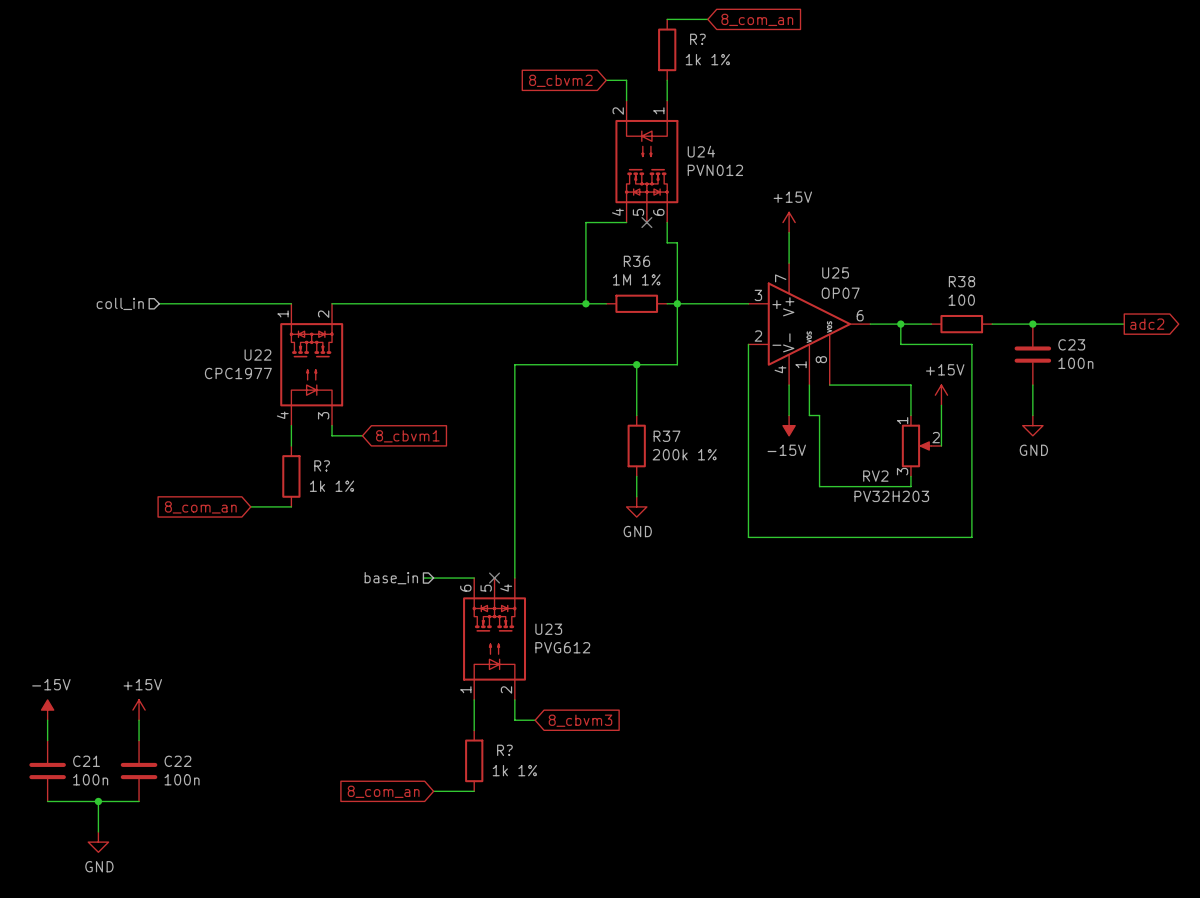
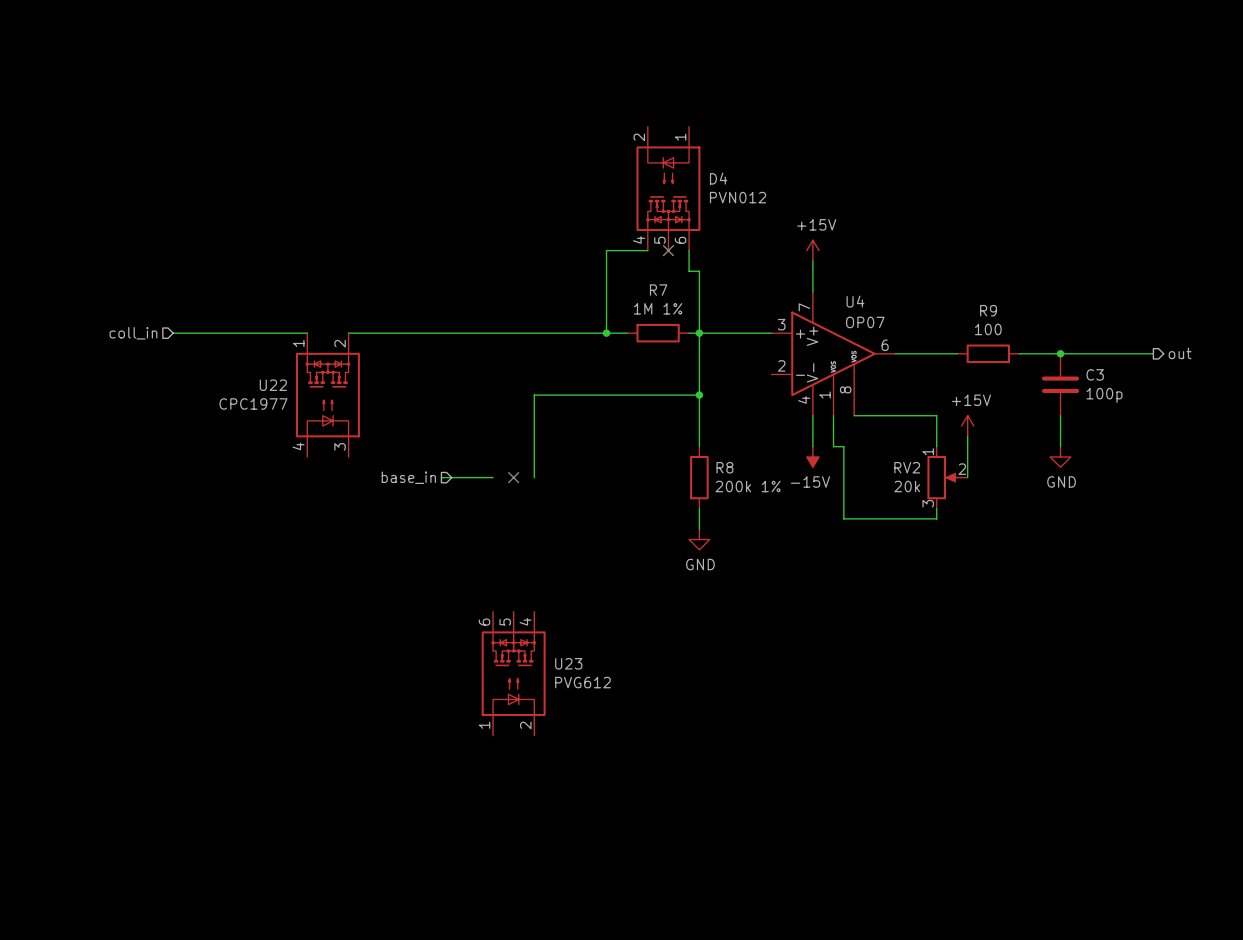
wire: (667, 19) (707, 19) -> none
global label: 8_com_an (757, 19) -> none
R?: 1k 1% (667, 49) -> none
global label: 8_cbvm2 (560, 80) -> none
wire: (606, 80) (626, 80) (626, 100) -> none
wire: (667, 80) (667, 100) -> none
U24 name: U24 (701, 151) -> D4 (718, 178)
R36 name: R36 (636, 261) -> R7 (658, 290)
U25 name: U25 (835, 272) -> U4 (855, 301)
R38 name: R38 (961, 281) -> R9 (988, 310)
hierarchical label: none -> out (1180, 353)
wire: (900, 324) (900, 344) (971, 344) (971, 537) (748, 537) (748, 344) -> none
junction: (900, 324) -> none
global label: adc2 (1147, 324) -> none
C23 name: C23 (1071, 344) -> C3 (1095, 374)
C23 value: 100n (1075, 363) -> 100p (1104, 395)
wire: (636, 364) (636, 415) -> (699, 395) (699, 446)
junction position: (636, 364) -> (699, 395)
wire: (291, 425) (291, 445) -> none
wire: (332, 425) (332, 435) (362, 435) -> none
global label: 8_cbvm1 (407, 436) -> none
no-connect mark: none -> (513, 477)
wire: (514, 445) (514, 578) -> none
R37: 200k 1% (636, 445) -> none
R8: none -> 200k 1% (699, 477)
R?: 1k 1% (291, 476) -> none
wire: (636, 476) (636, 496) -> (699, 508) (699, 529)
RV2 name position: RV2 (875, 476) -> RV2 (907, 467)
RV2 value: PV32H203 (891, 496) -> 20k (907, 486)
wire: (250, 506) (291, 506) -> none
power symbol position: GND (636, 506) -> GND (699, 539)
global label: 8_com_an (200, 507) -> none
hierarchical label position: base_in (391, 578) -> base_in (408, 477)
wire: (423, 578) (474, 578) -> (441, 477) (493, 477)
no-connect mark: (494, 578) -> none
wire: (474, 699) (474, 730) -> none
wire: (514, 699) (514, 720) (535, 720) -> none
power symbol: -15V (47, 710) -> none
power symbol: +15V (139, 710) -> none
wire: (47, 720) (47, 740) -> none
wire: (139, 720) (139, 740) -> none
global label: 8_cbvm3 (580, 720) -> none
R?: 1k 1% (474, 760) -> none
C21: 100n (47, 771) -> none
C22: 100n (139, 771) -> none
global label: 8_com_an (383, 791) -> none
wire: (433, 791) (474, 791) -> none
wire: (47, 801) (139, 801) -> none
wire: (98, 801) (98, 831) -> none
junction: (98, 801) -> none
power symbol: GND (98, 842) -> none

